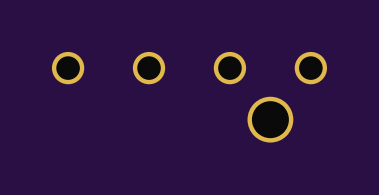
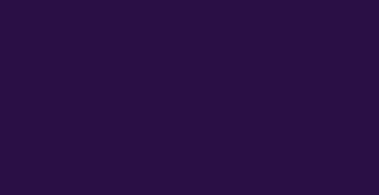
part: (189, 97) -> none

